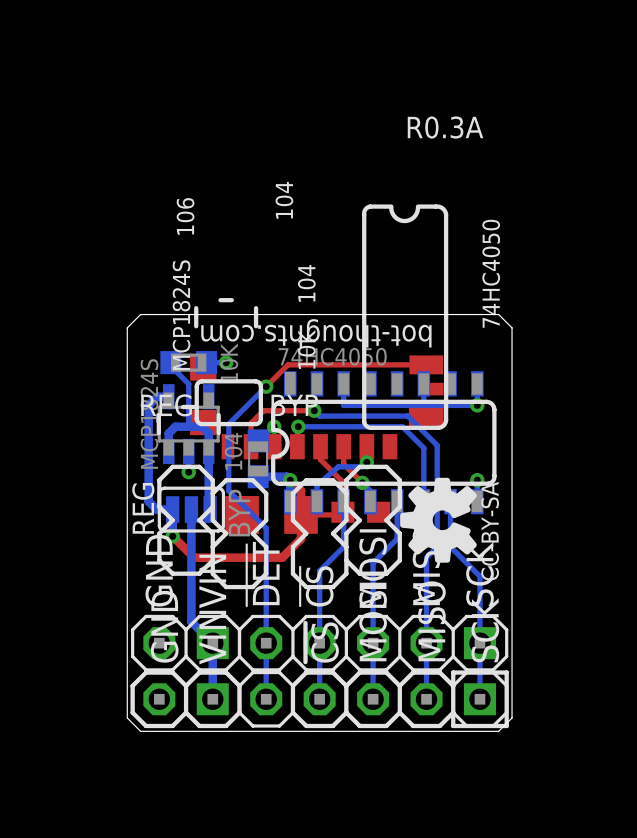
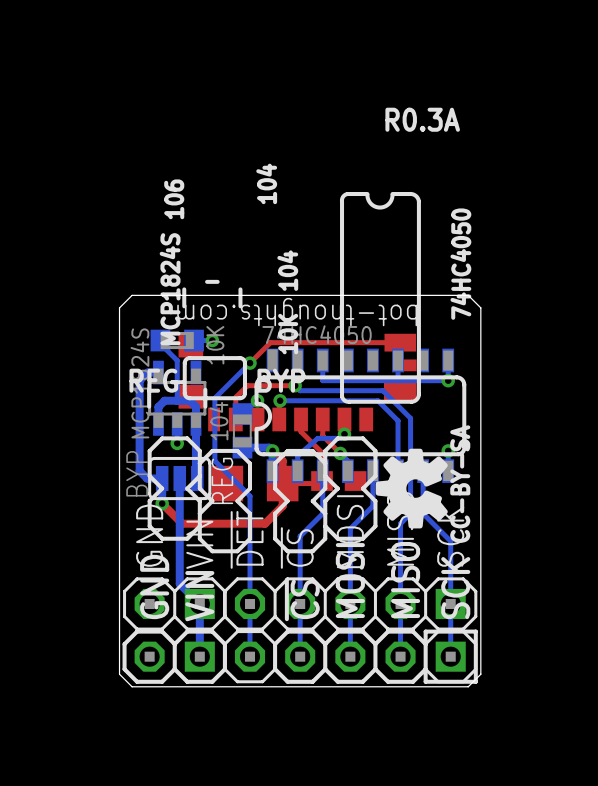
REG name position: REG (143, 508) -> REG (222, 480)
REG value position: BYP (239, 513) -> BYP (137, 473)

